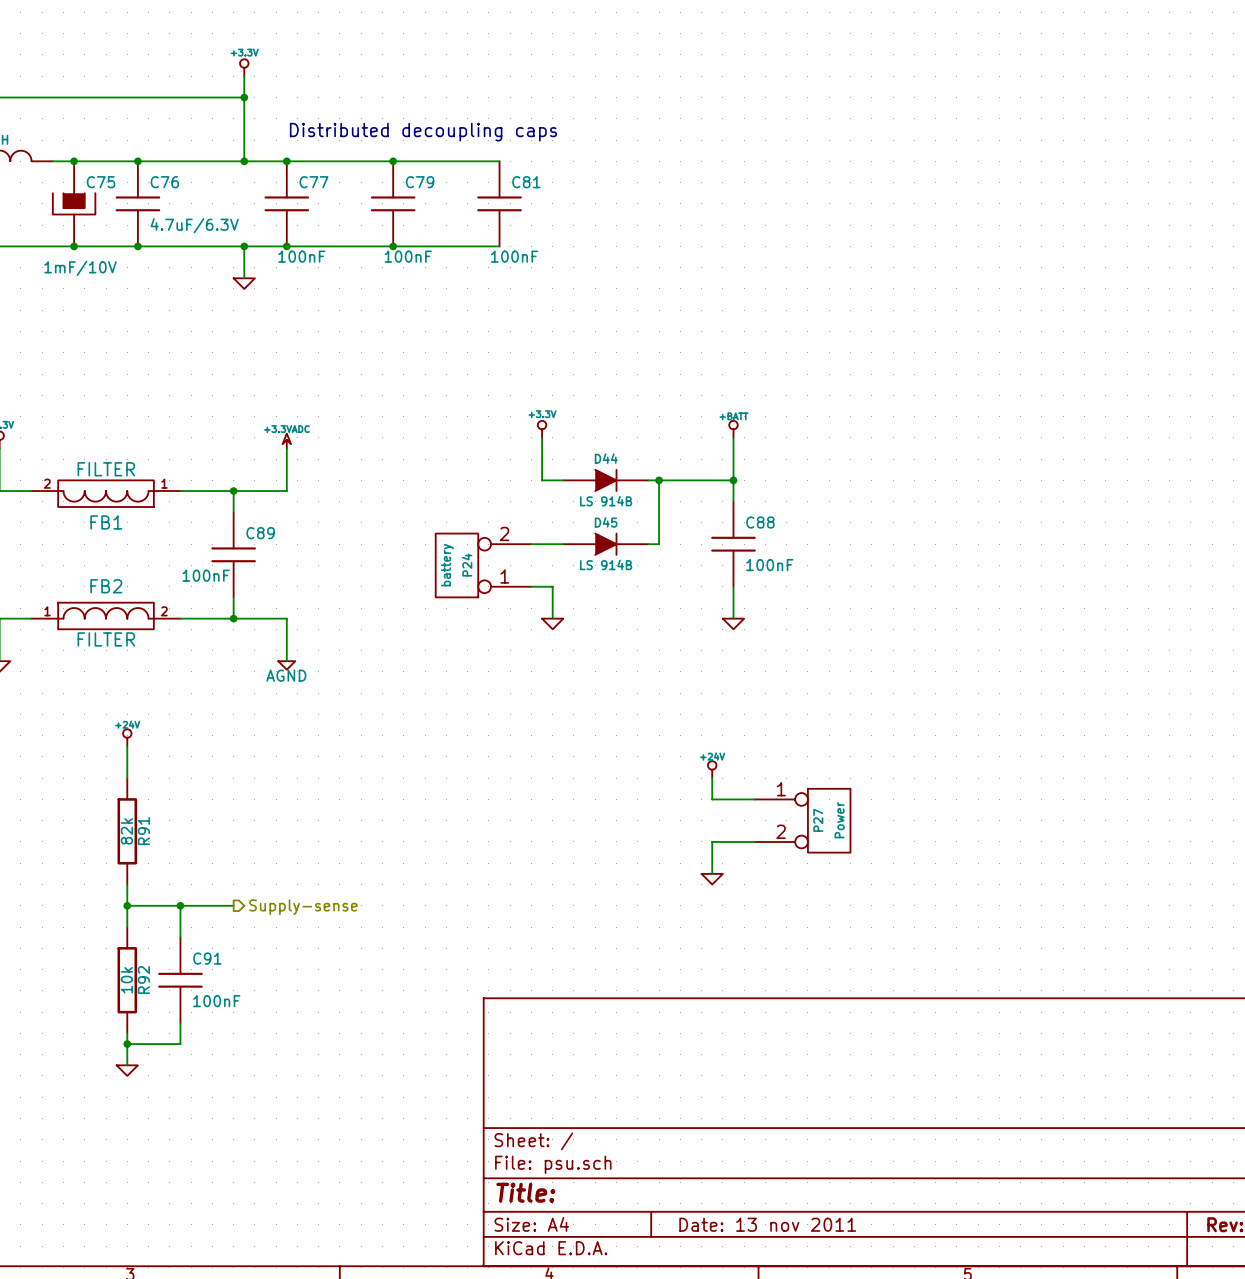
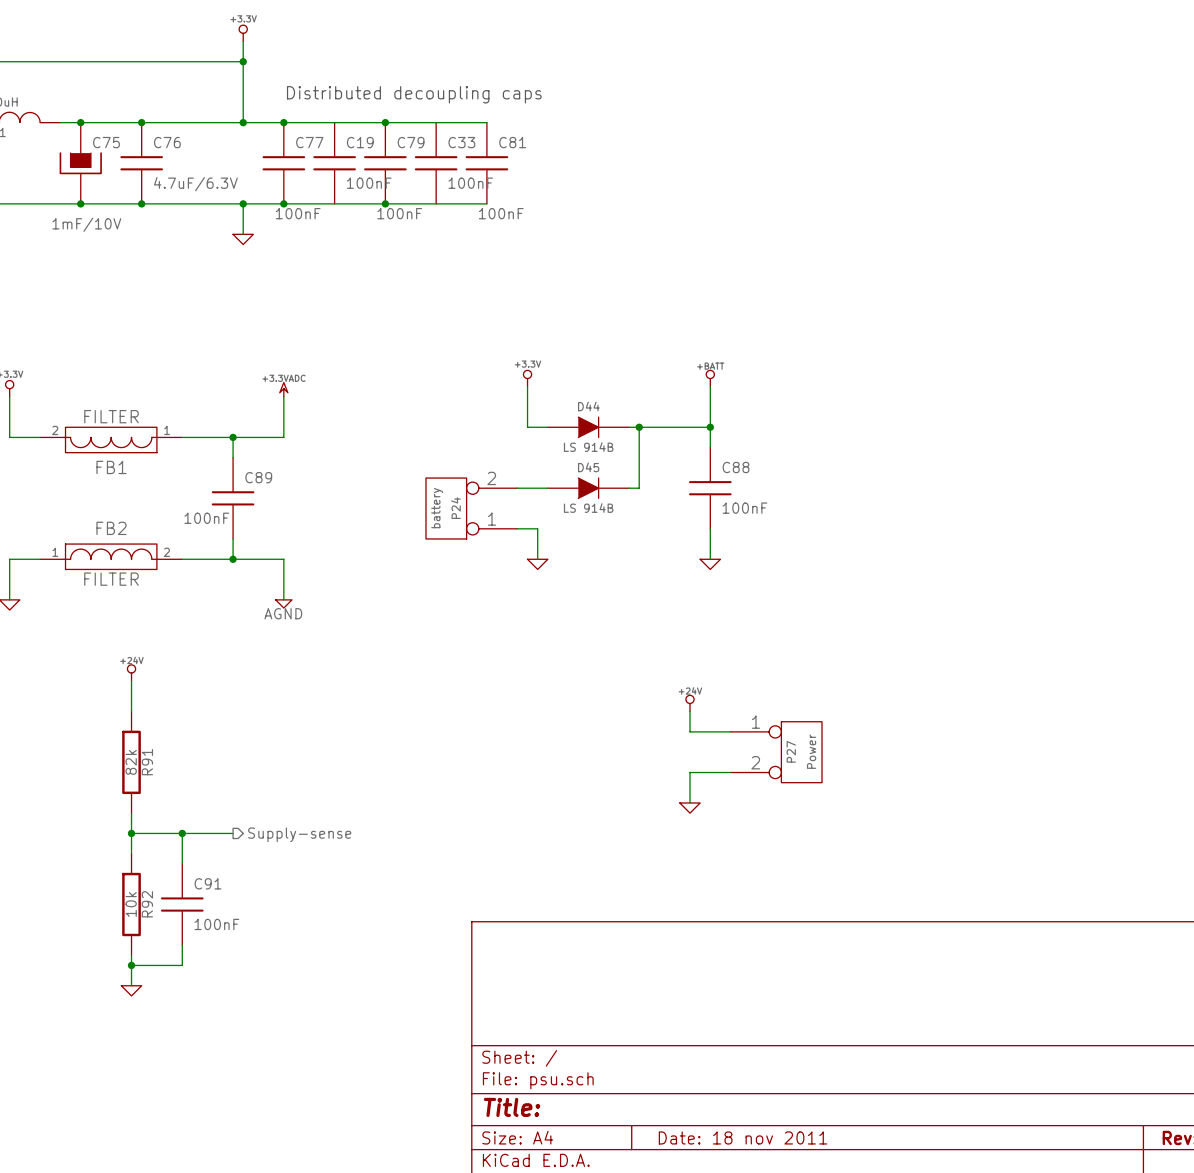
C19: none -> 100nF (334, 163)
C33: none -> 100nF (436, 163)
title block: Date: 13 nov 2011 (767, 1224) -> Date: 18 nov 2011 (743, 1137)

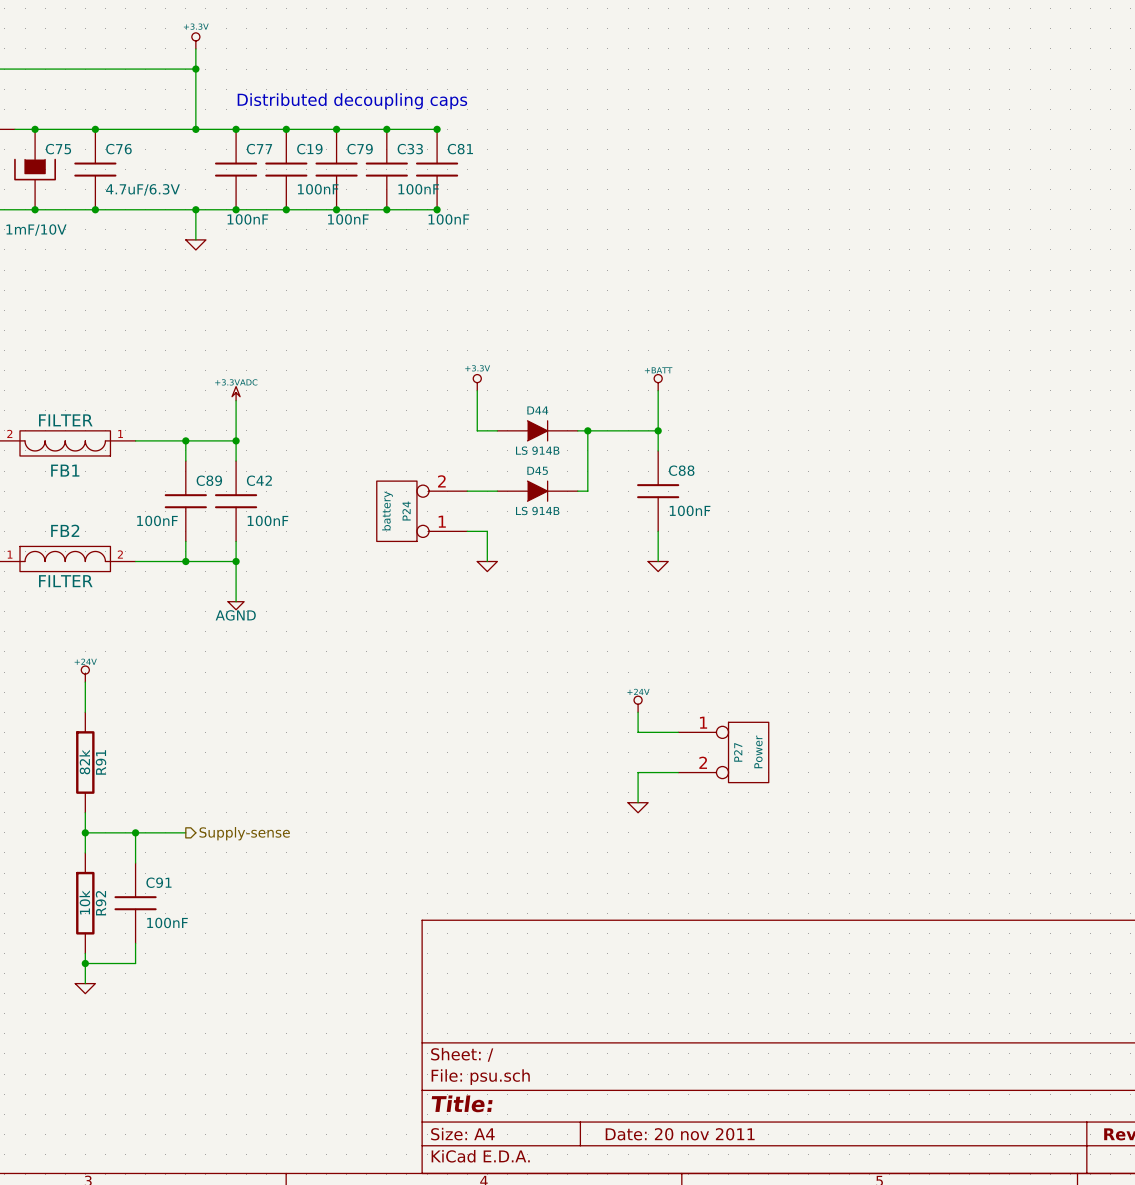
junction: none -> (286, 129)
junction: none -> (386, 129)
junction: none -> (437, 129)
junction: none -> (286, 209)
junction: none -> (386, 209)
junction: none -> (437, 209)
wire: none -> (236, 440) (236, 461)
junction: none -> (236, 440)
C42: none -> 100nF (236, 501)
wire: none -> (236, 541) (236, 561)
junction: none -> (236, 561)
title block: Date: 18 nov 2011 (743, 1137) -> Date: 20 nov 2011 (680, 1134)

